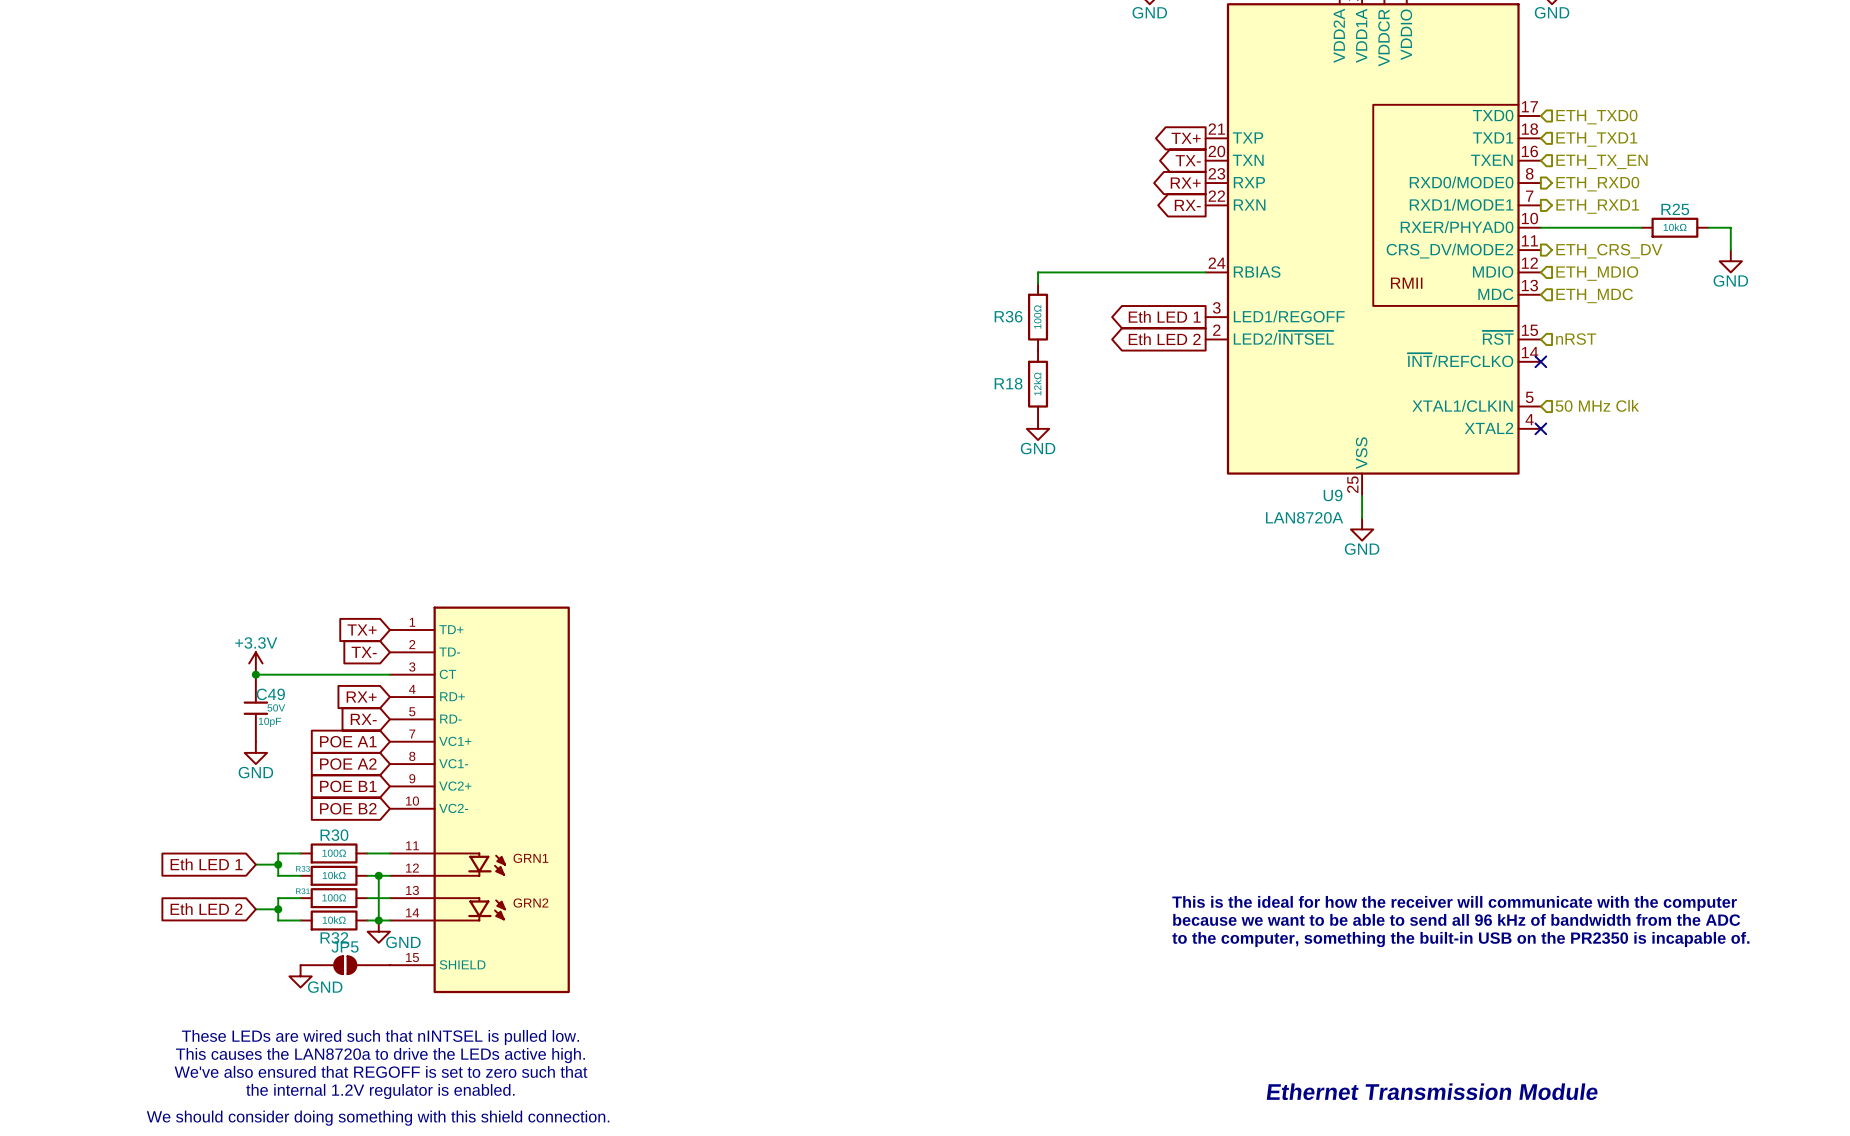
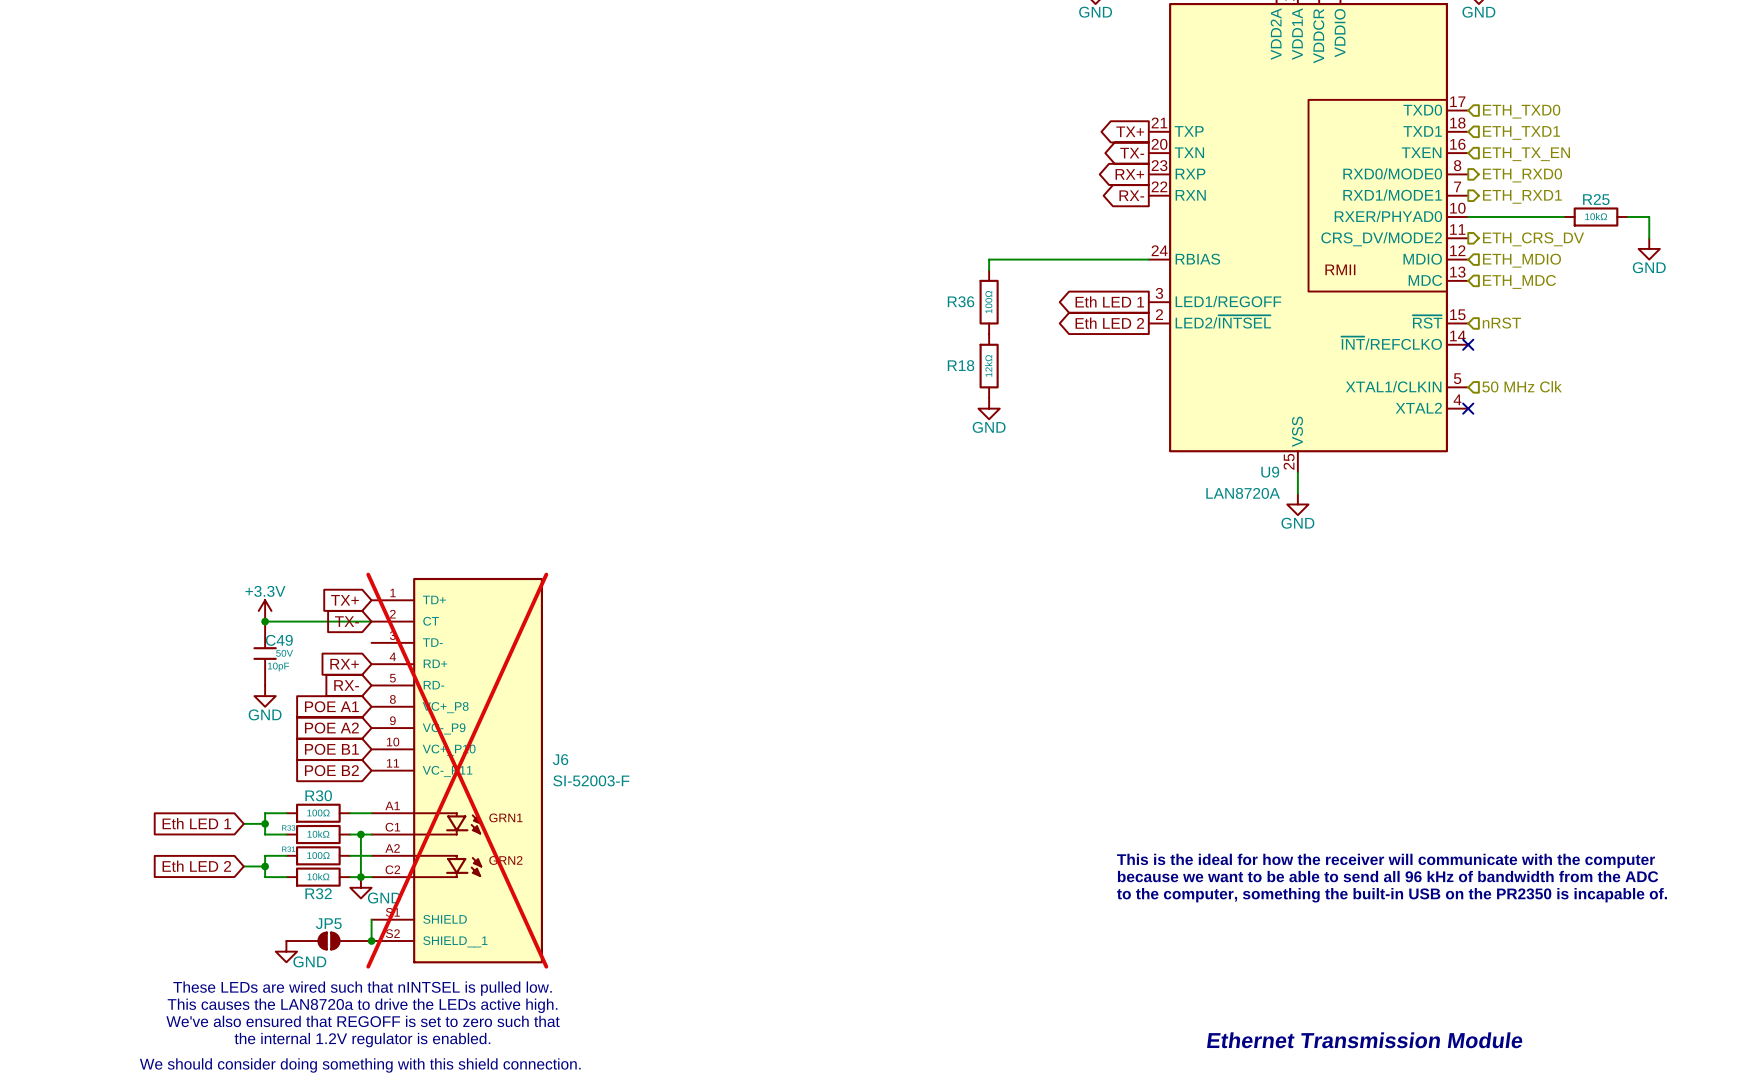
wire: none -> (265, 621) (371, 621)
power symbol position: +3.3V (255, 663) -> +3.3V (265, 610)
wire: (255, 674) (389, 674) -> none
junction position: (255, 674) -> (265, 621)
C49 position: (255, 708) -> (265, 653)
power symbol position: GND (255, 752) -> GND (265, 696)
part: (479, 799) -> none
J6: none -> SI-52003-F (457, 770)
JP5 position: (345, 965) -> (328, 941)
wire: none -> (371, 919) (371, 941)
power symbol position: GND (300, 976) -> GND (286, 951)
junction: none -> (371, 941)

